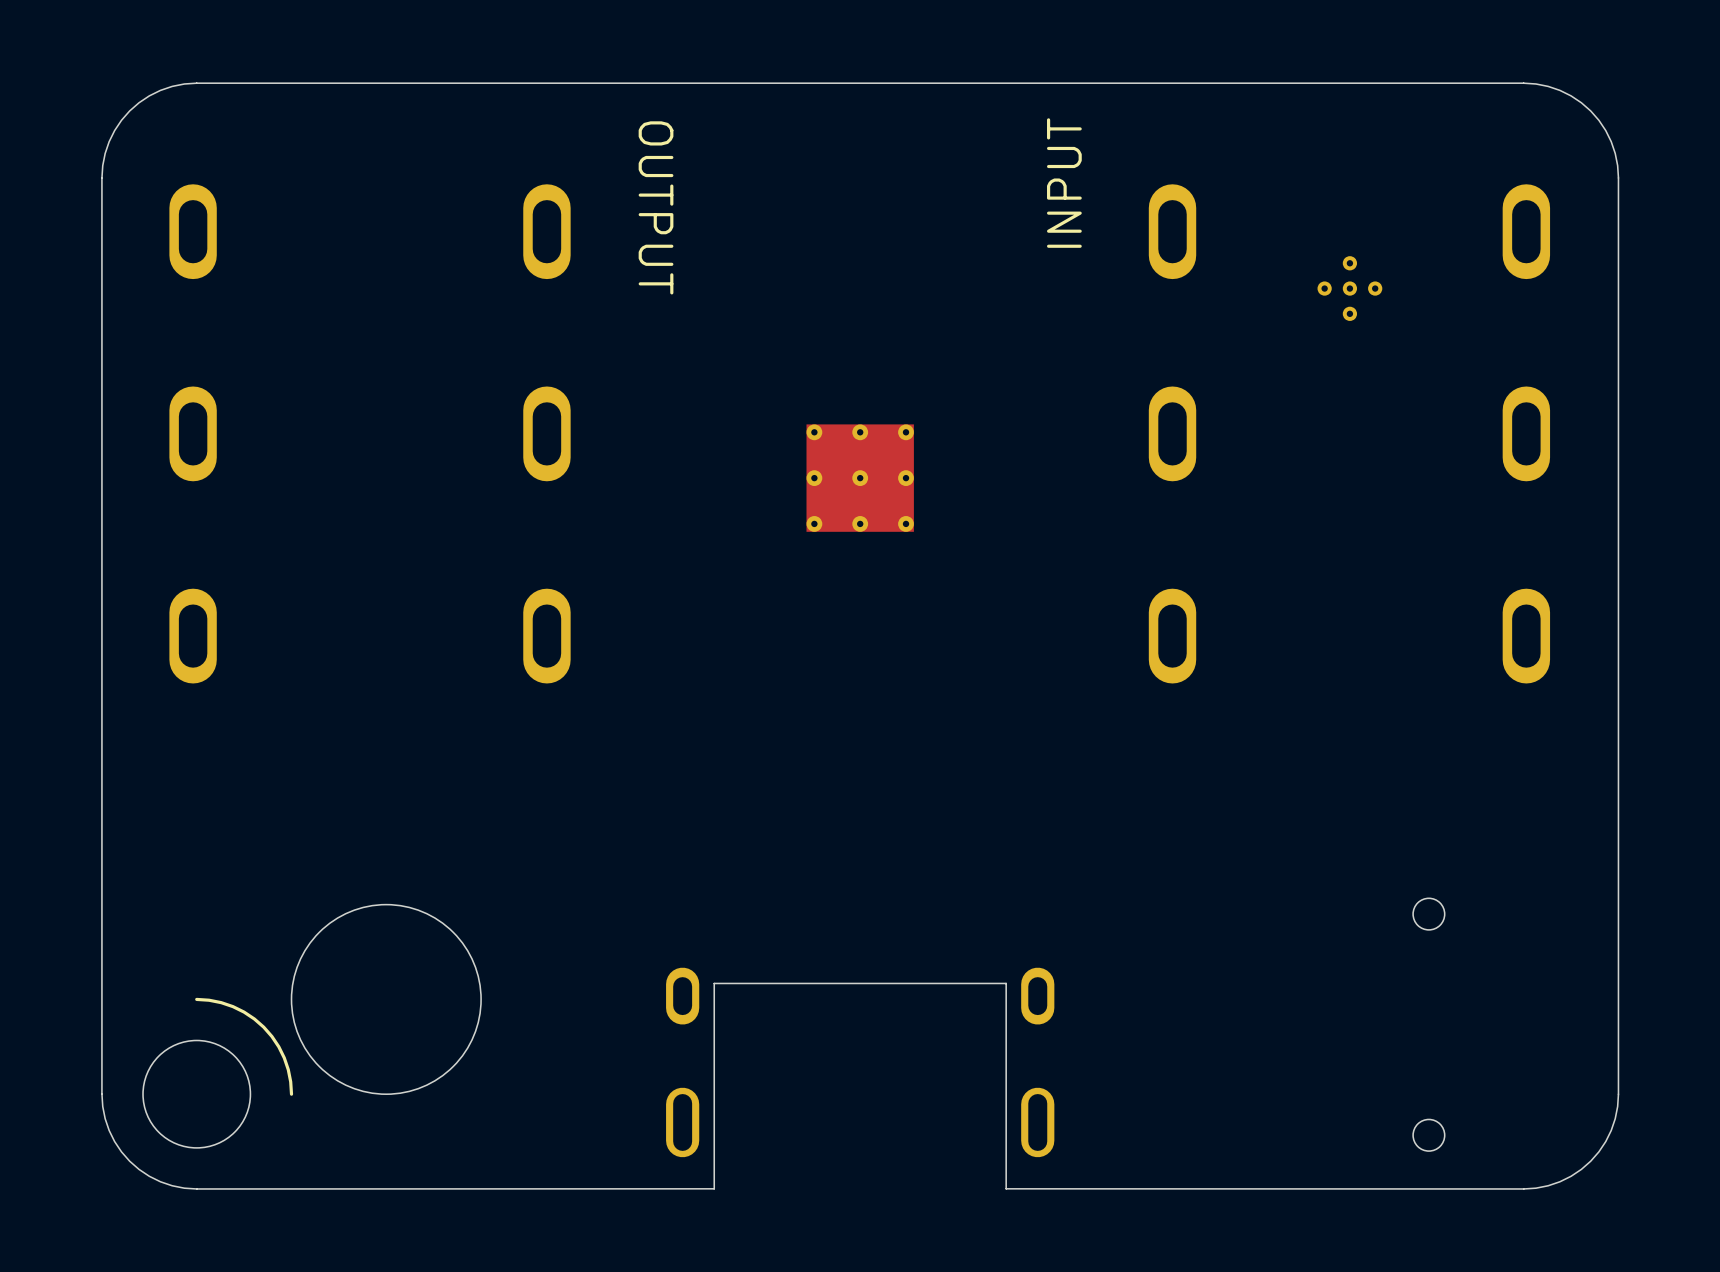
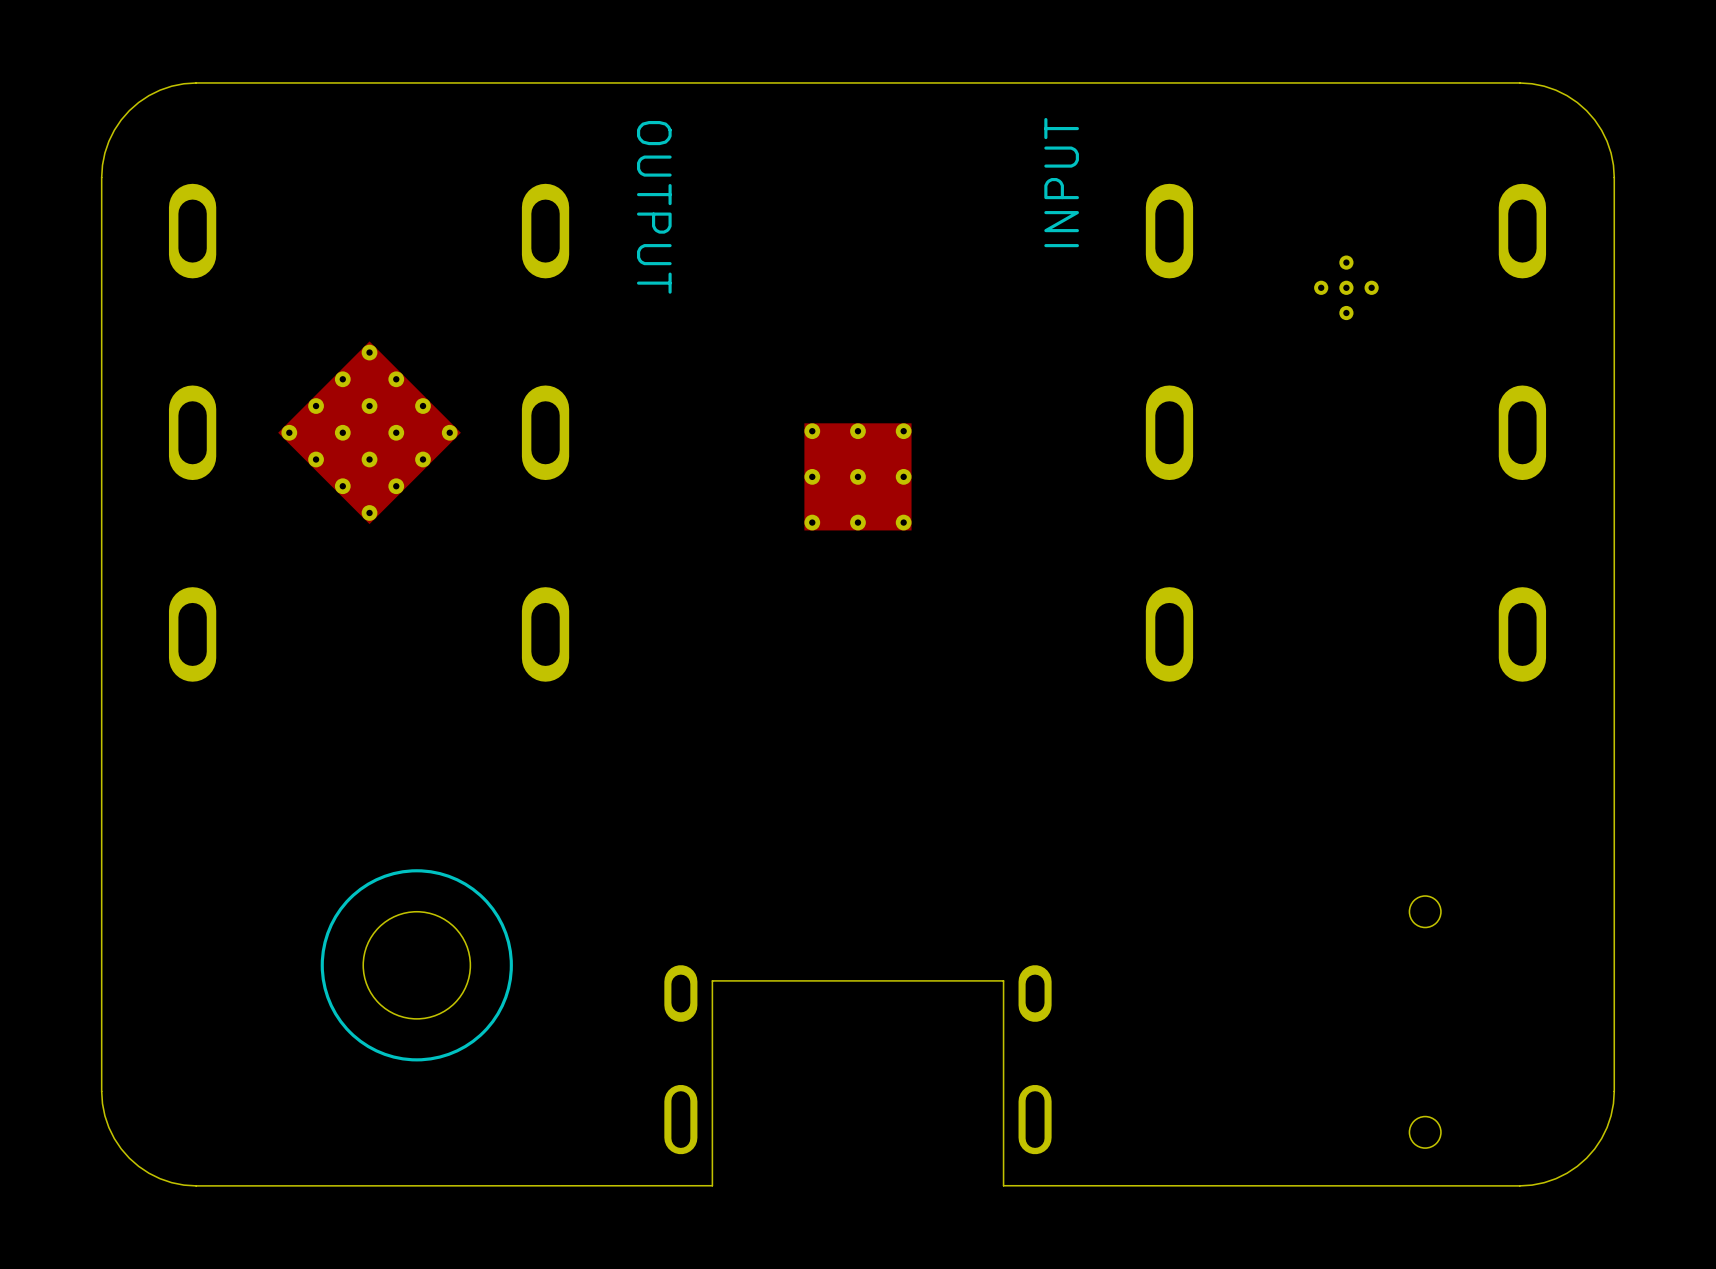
part: none -> (369, 432)
drawing: none -> [320, 869, 513, 1062]
round board edge: [290, 903, 482, 1095] -> none
line: (196, 999) (221, 1002) (233, 1006) (244, 1012) (263, 1027) (271, 1036) (284, 1057) (288, 1069) (291, 1094) -> none
round board edge position: (196, 1094) -> (416, 965)

